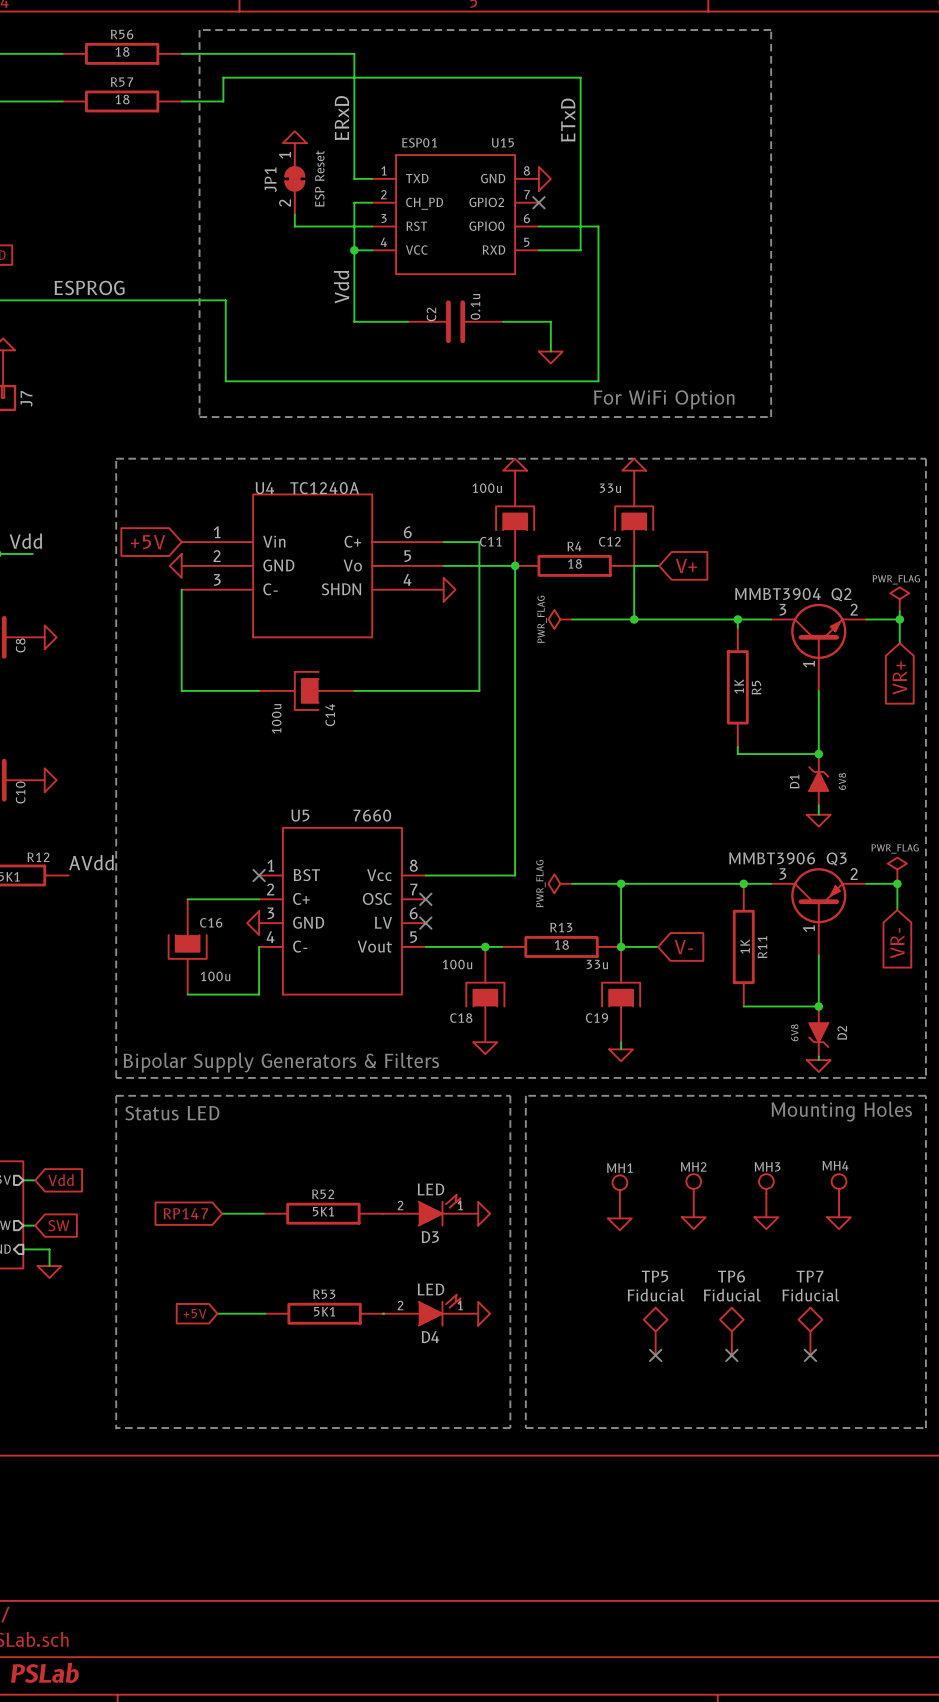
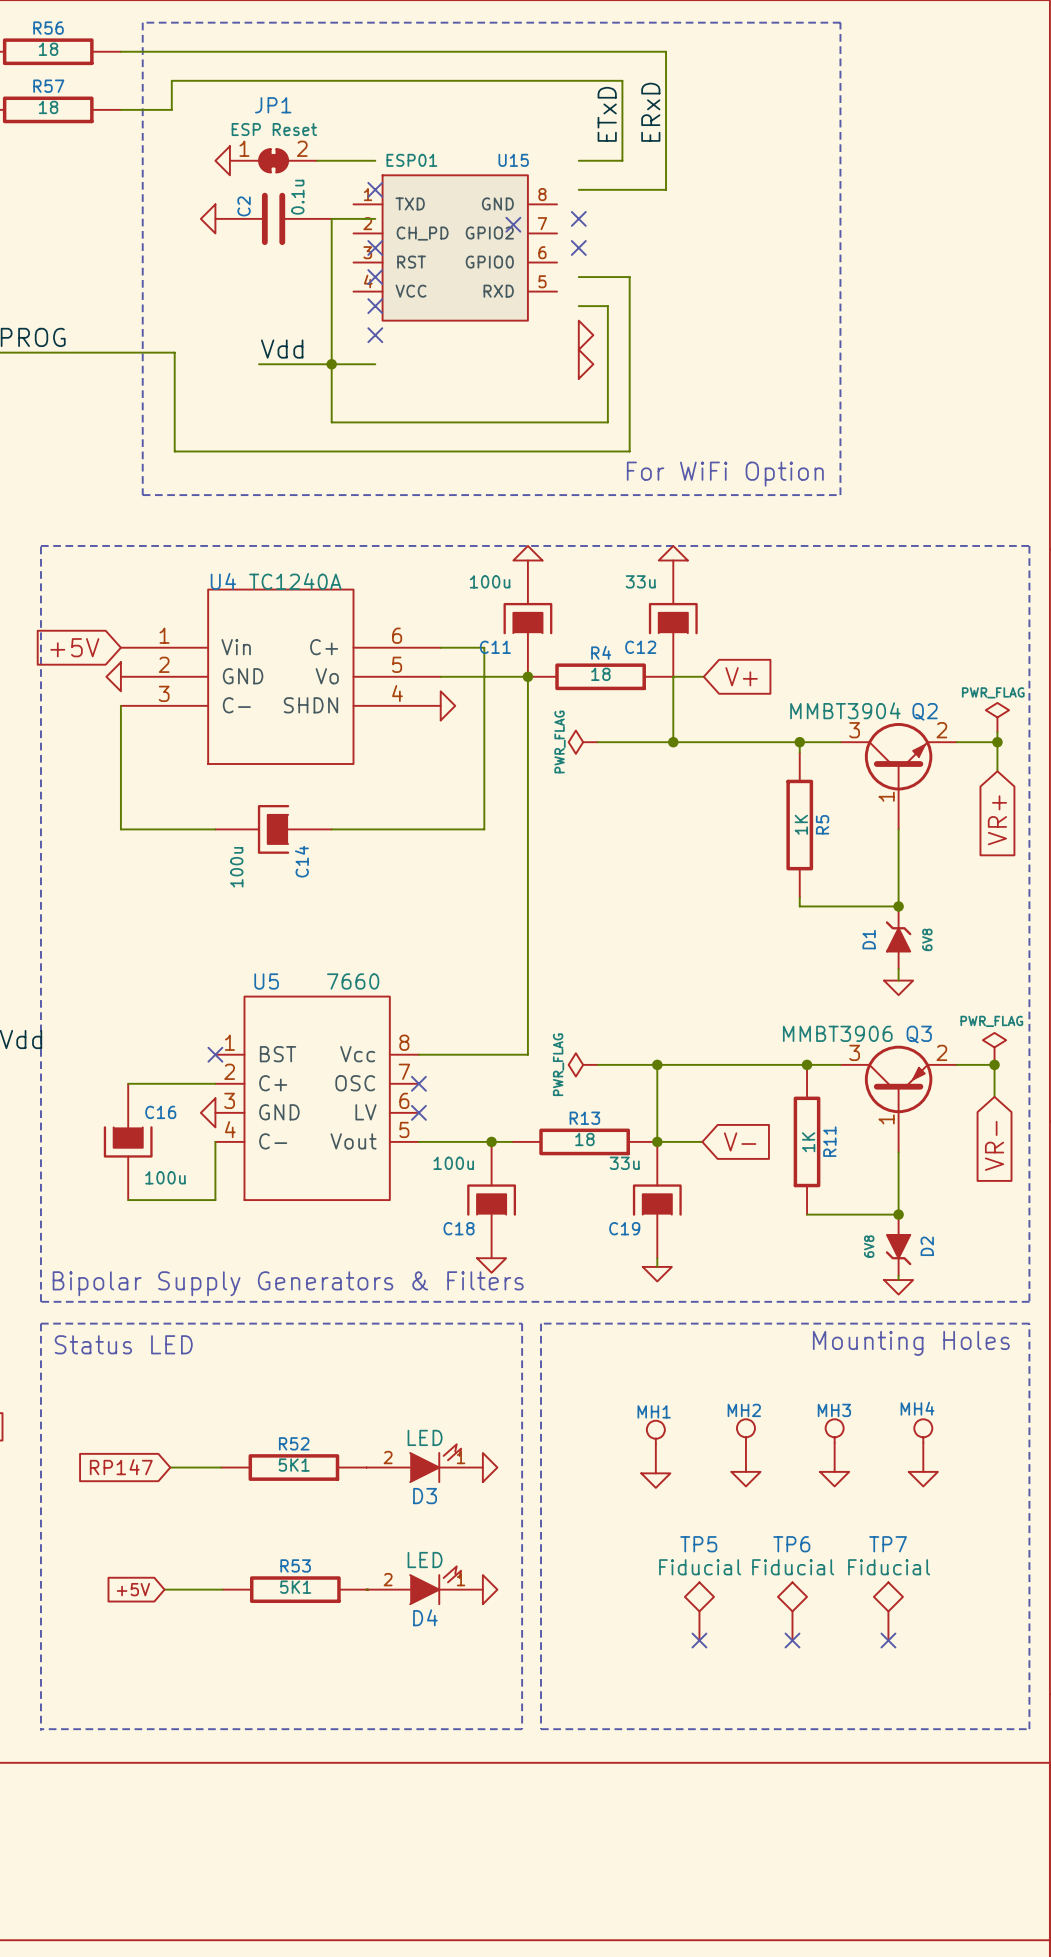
wire: (354, 53) (354, 178) (372, 178) -> (331, 51) (666, 51) (666, 189) (578, 189)
wire: (580, 77) (580, 250) (538, 250) -> (607, 80) (622, 80) (622, 160) (578, 160)
label: none -> ERxD (650, 112)
label: ERxD (341, 118) -> none
label position: ETxD (568, 120) -> ETxD (607, 114)
power symbol rotation: 0° (294, 137) -> 90° counterclockwise (222, 160)
power symbol position: (294, 137) -> (222, 160)
wire: none -> (317, 160) (375, 160)
no-connect mark: none -> (375, 189)
JP1 rotation: 0° (294, 178) -> 90° counterclockwise (273, 160)
power symbol: (544, 178) -> none
JP1 name position: JP1 (270, 179) -> JP1 (273, 105)
power symbol: none -> (208, 218)
no-connect mark: none -> (578, 218)
no-connect mark: none -> (513, 224)
wire: (354, 202) (372, 202) -> (331, 233) (331, 218) (375, 218)
no-connect mark: (538, 202) -> none
wire: (294, 214) (294, 226) (372, 226) -> none
no-connect mark: none -> (375, 247)
no-connect mark: none -> (578, 247)
wire: (538, 226) (598, 226) (598, 238) -> (578, 277) (629, 277)
no-connect mark: none -> (375, 277)
wire: (354, 250) (372, 250) -> none
junction: (354, 250) -> none
no-connect mark: none -> (375, 306)
no-connect mark: none -> (375, 335)
power symbol: none -> (586, 335)
label rotation: 0° (341, 287) -> 90° clockwise (282, 349)
wire: none -> (259, 364) (375, 364)
junction: none -> (331, 364)
power symbol: none -> (586, 364)
wire: (354, 321) (407, 321) -> (331, 378) (331, 422) (607, 422) (607, 306) (578, 306)
C2 position: (455, 321) -> (273, 218)
wire: (503, 321) (550, 321) (550, 351) -> none
power symbol: (550, 357) -> none

